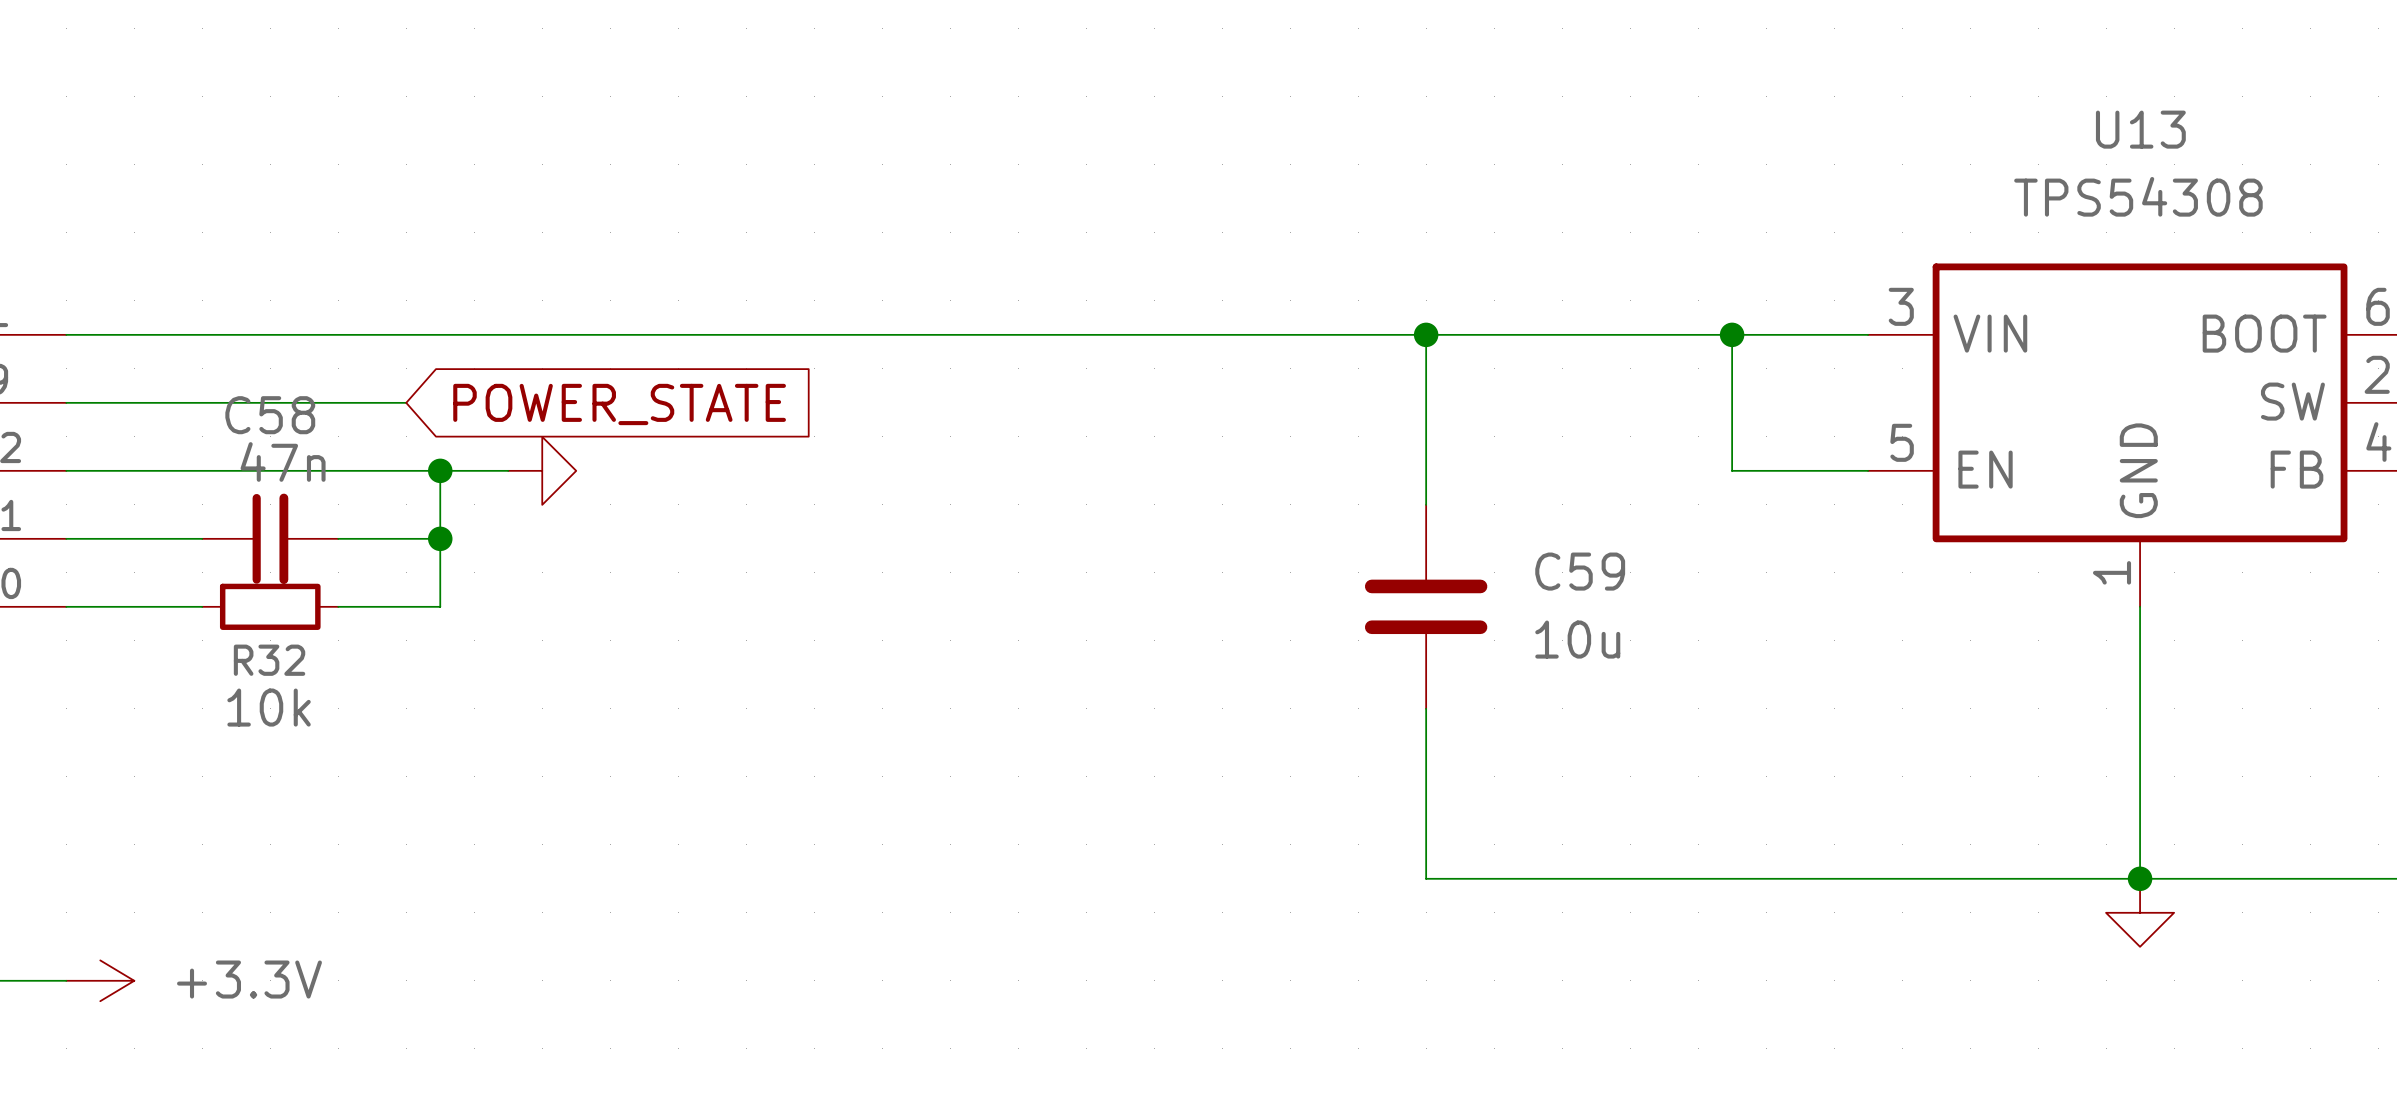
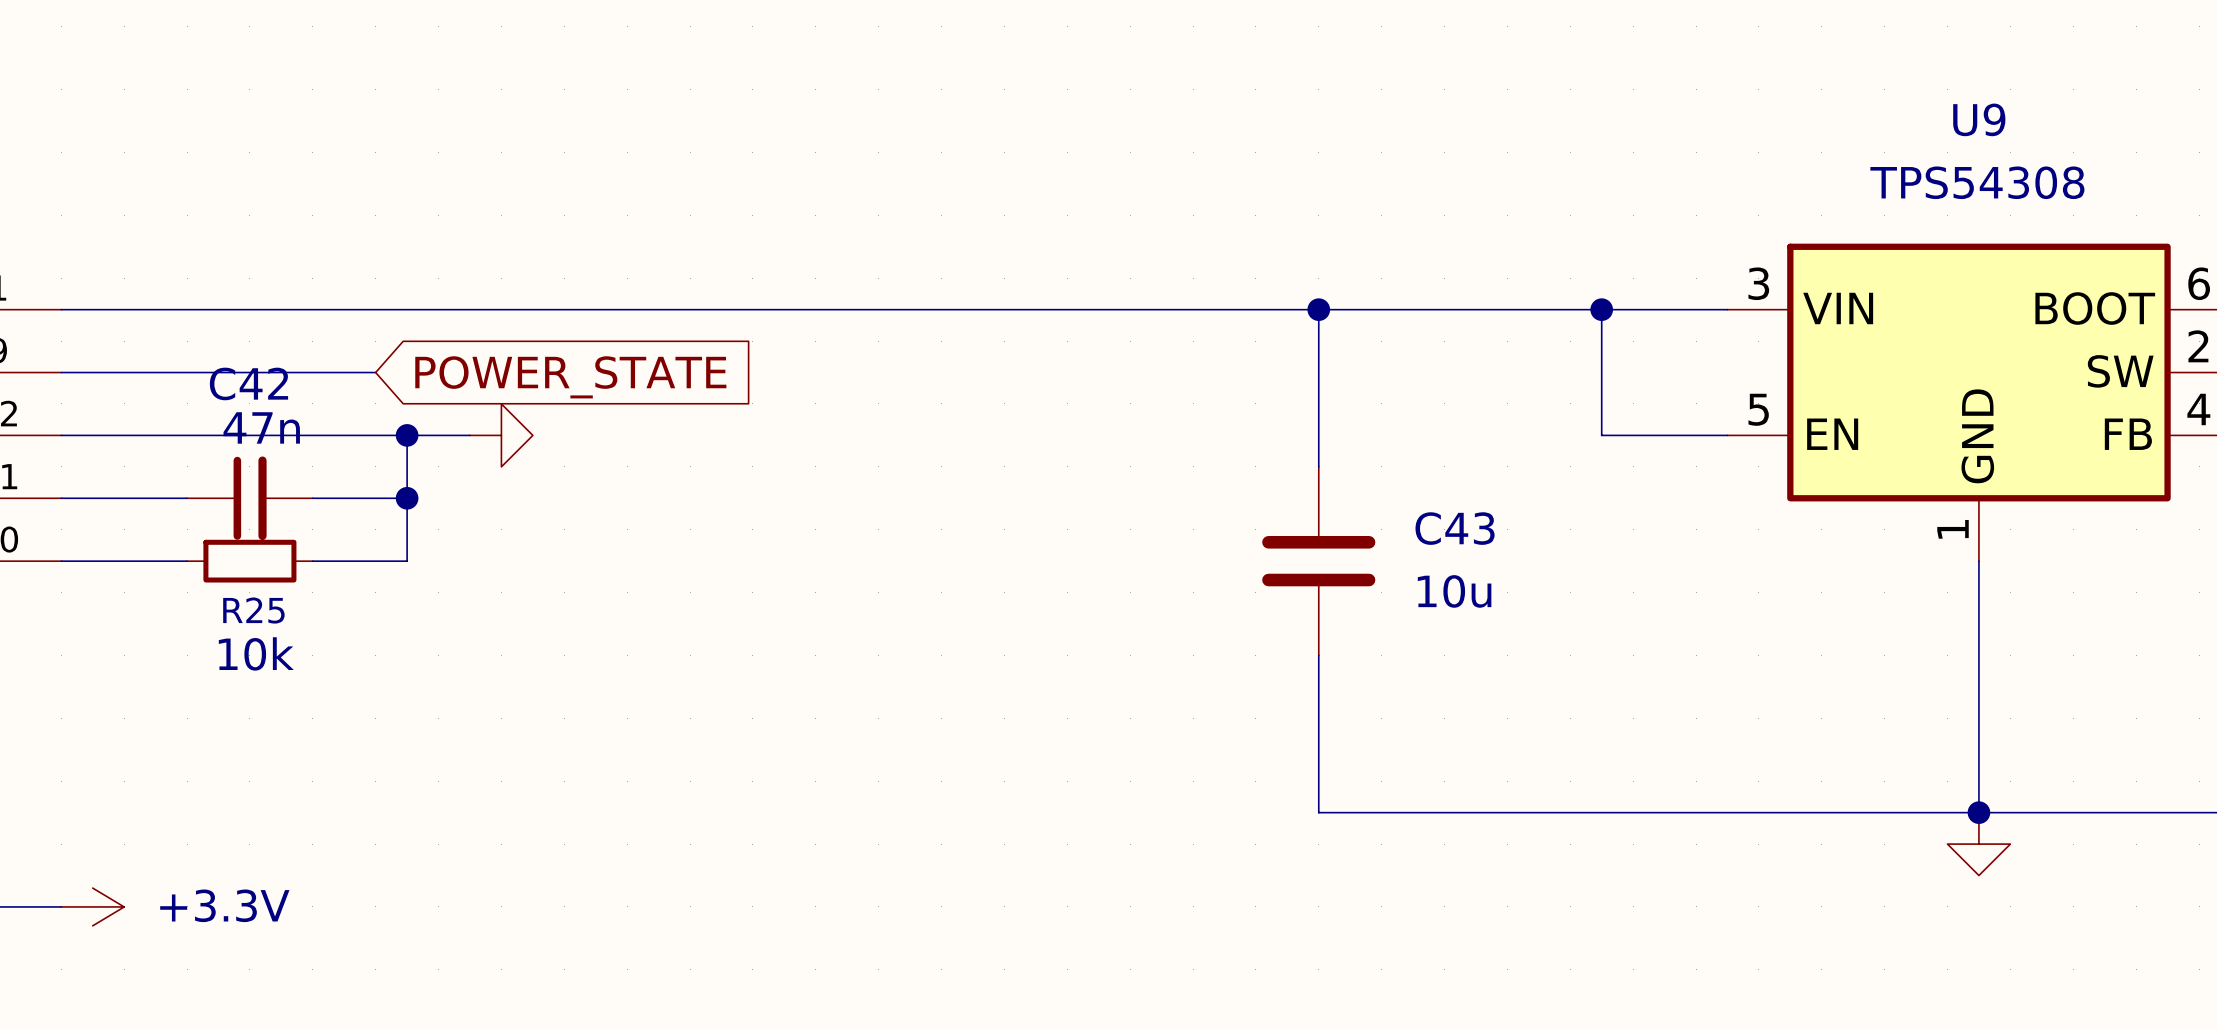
U13 name: U13 (2140, 129) -> U9 (1979, 119)
C58 name: C58 (270, 415) -> C42 (248, 383)
C59 name: C59 (1580, 571) -> C43 (1455, 528)
R32 name: R32 (269, 660) -> R25 (253, 610)

